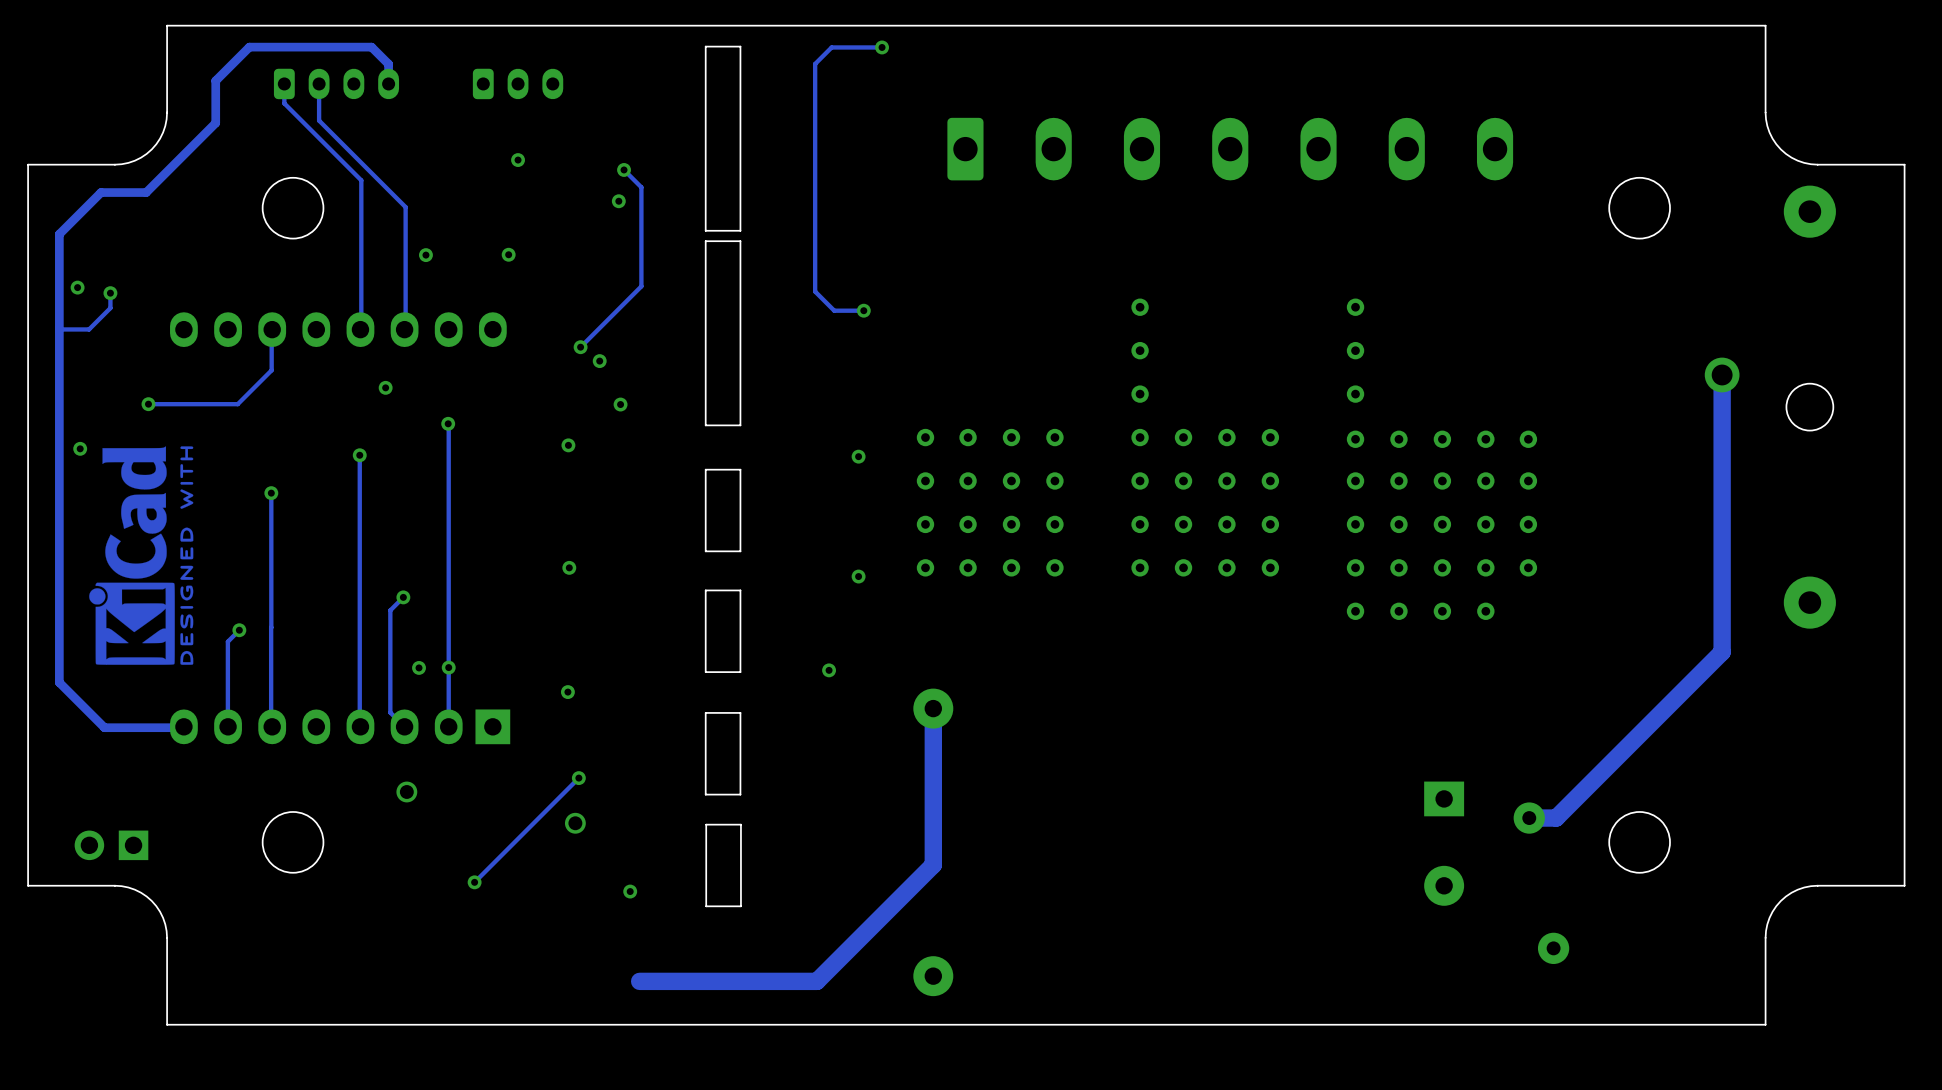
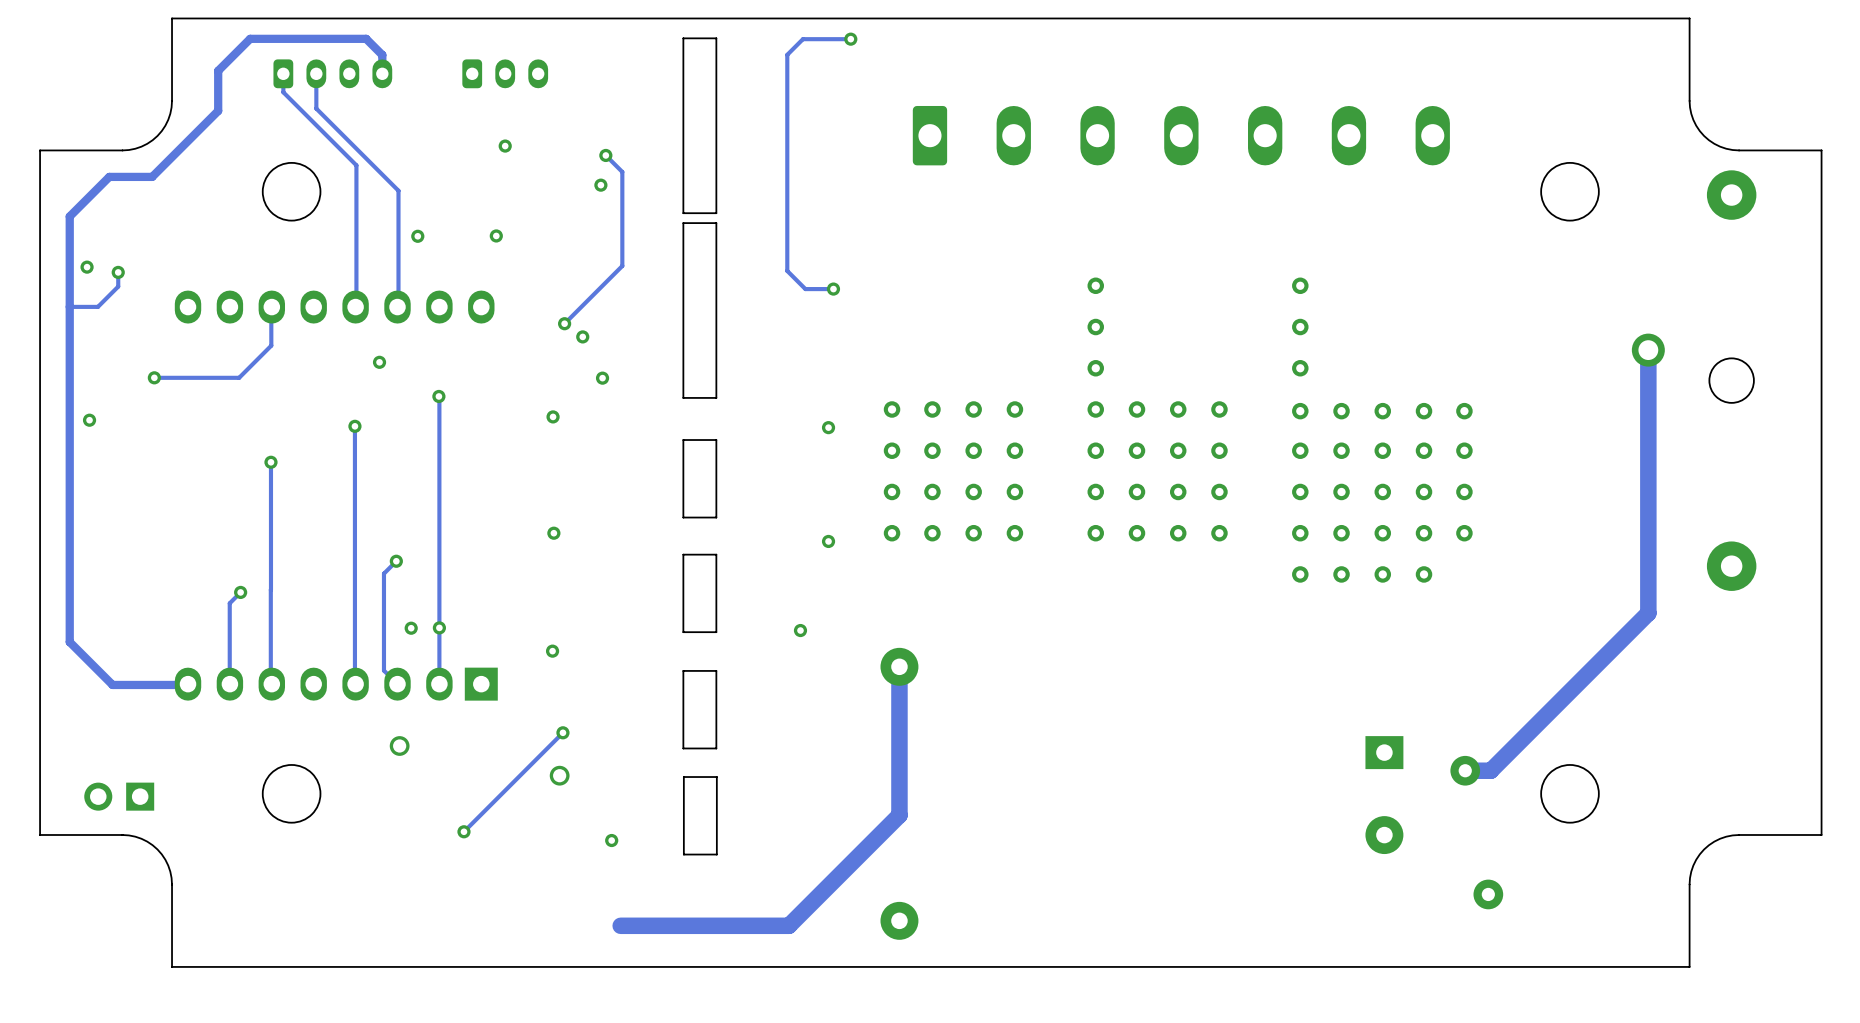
drawing: [89, 446, 194, 665] -> none

